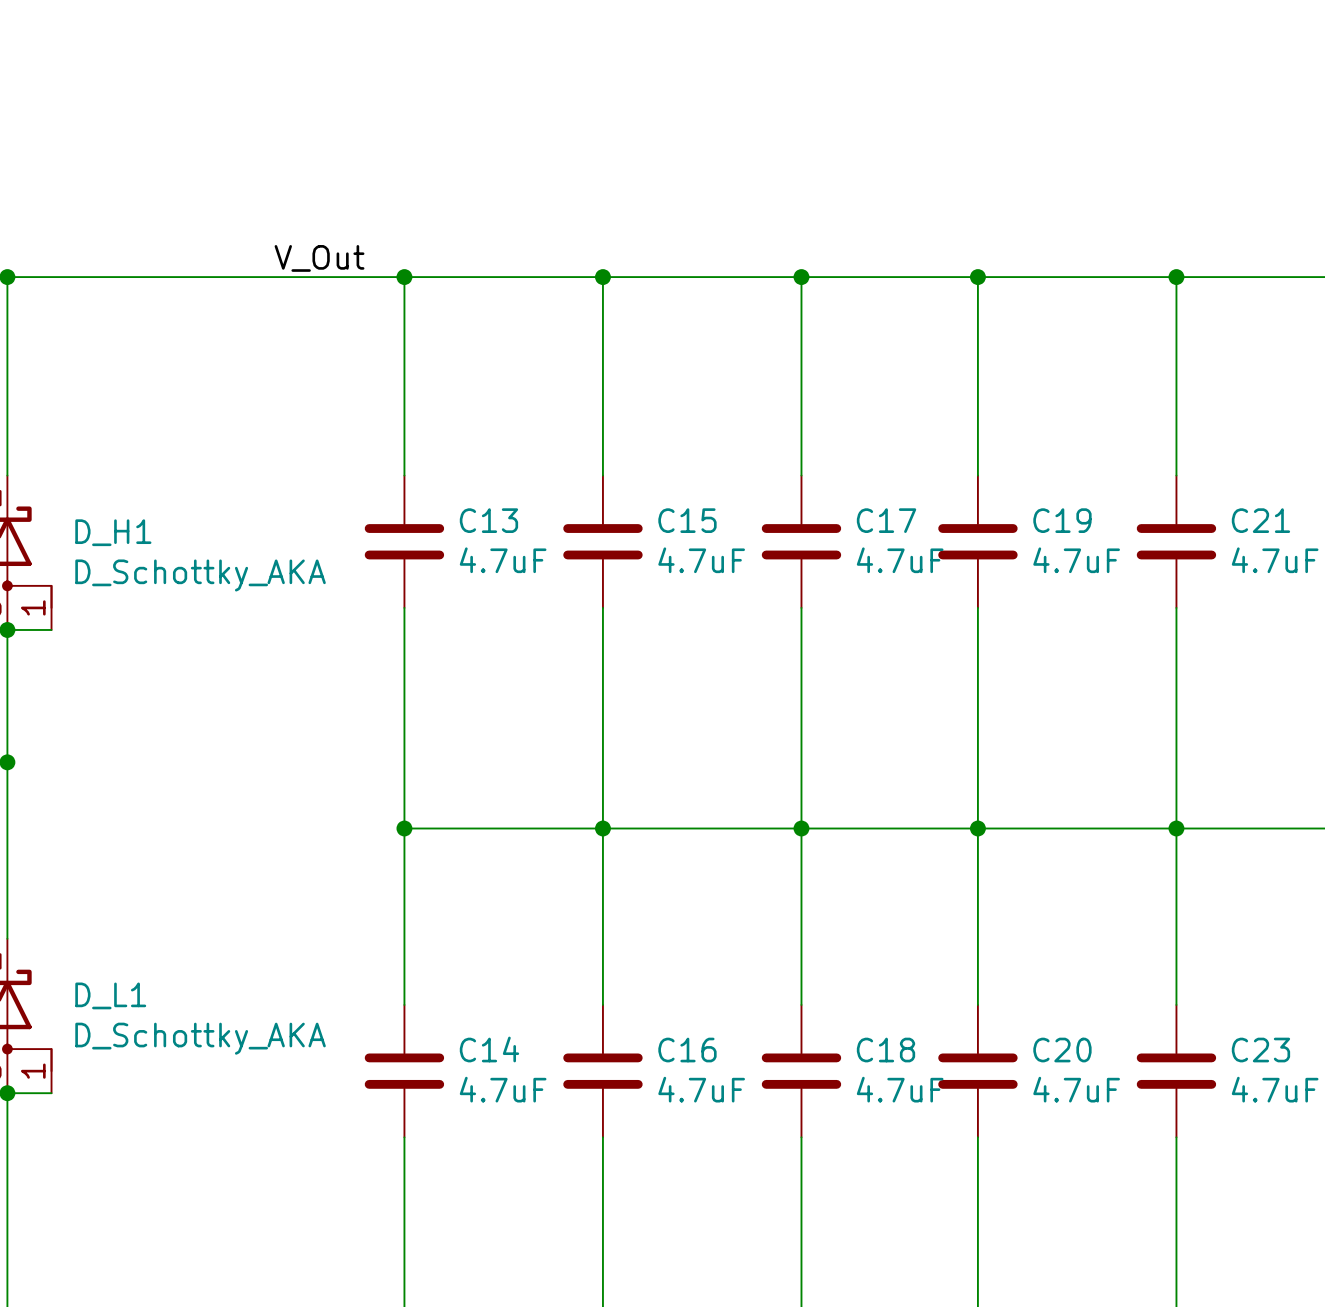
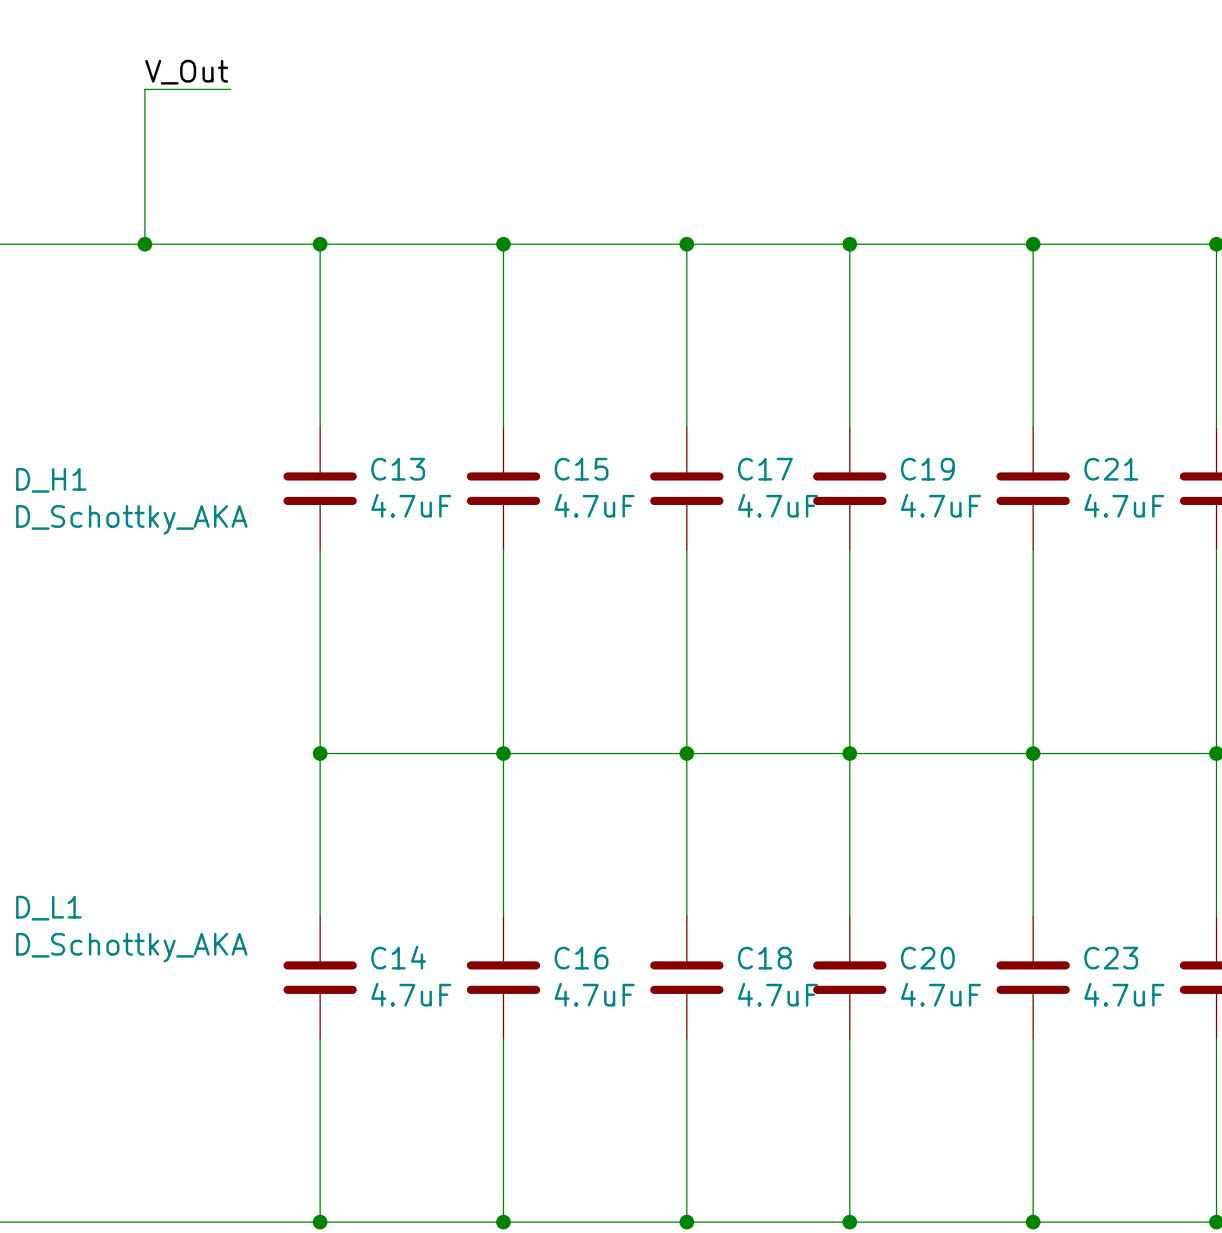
wire: none -> (230, 89) (144, 89) (144, 244)
label position: V_Out (319, 258) -> V_Out (186, 72)
junction: none -> (144, 244)

